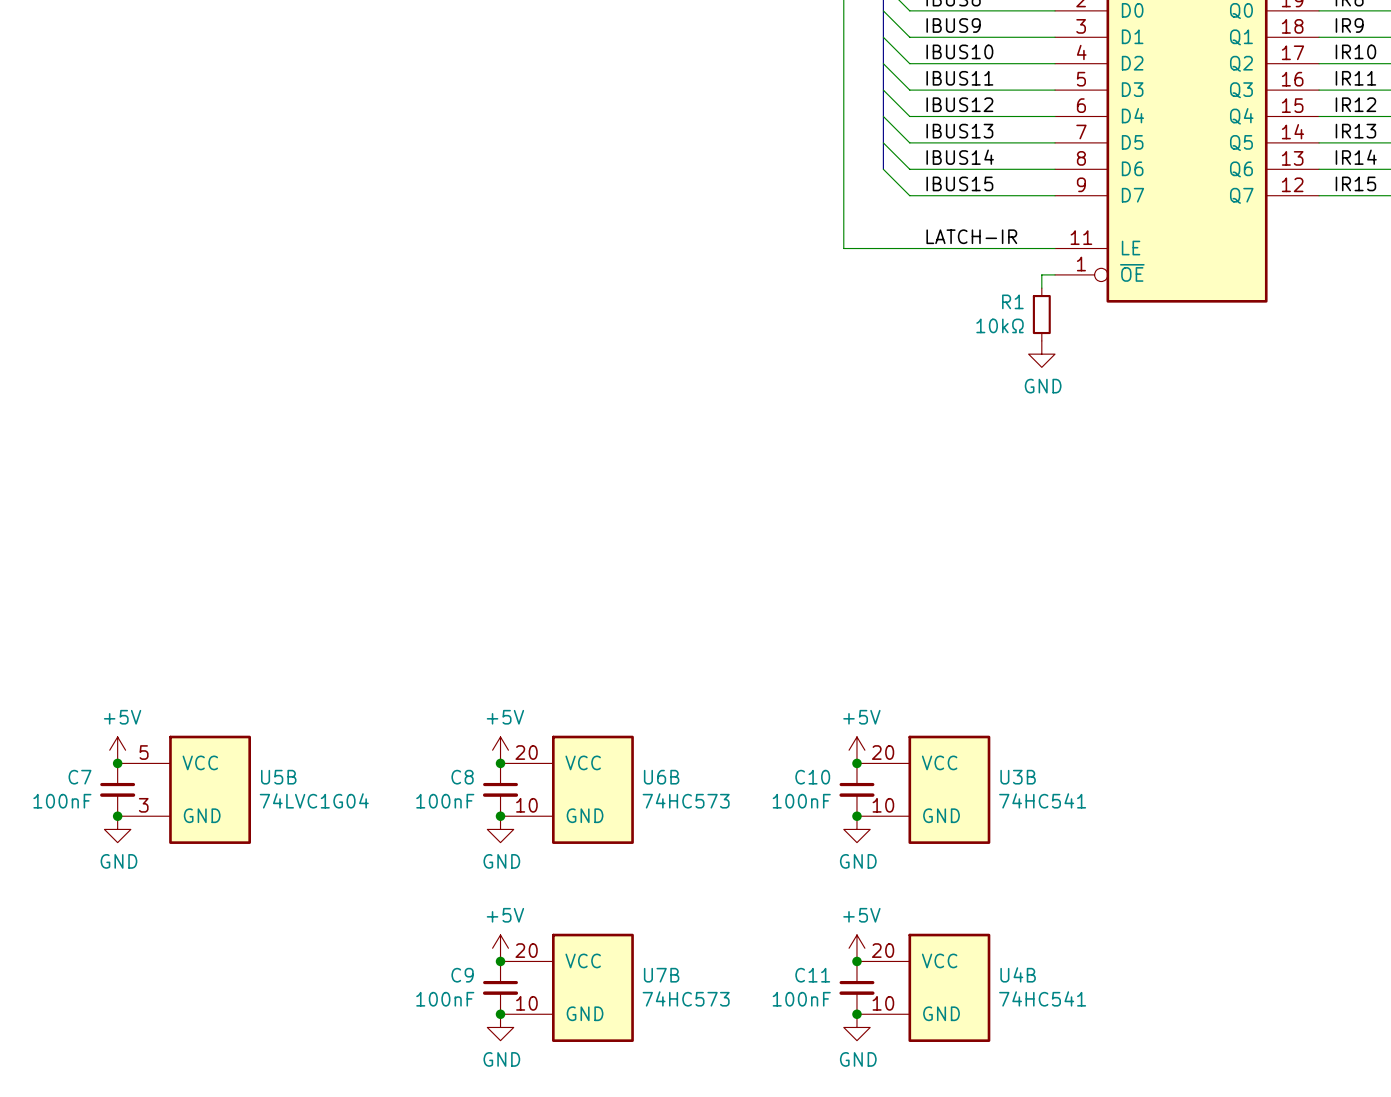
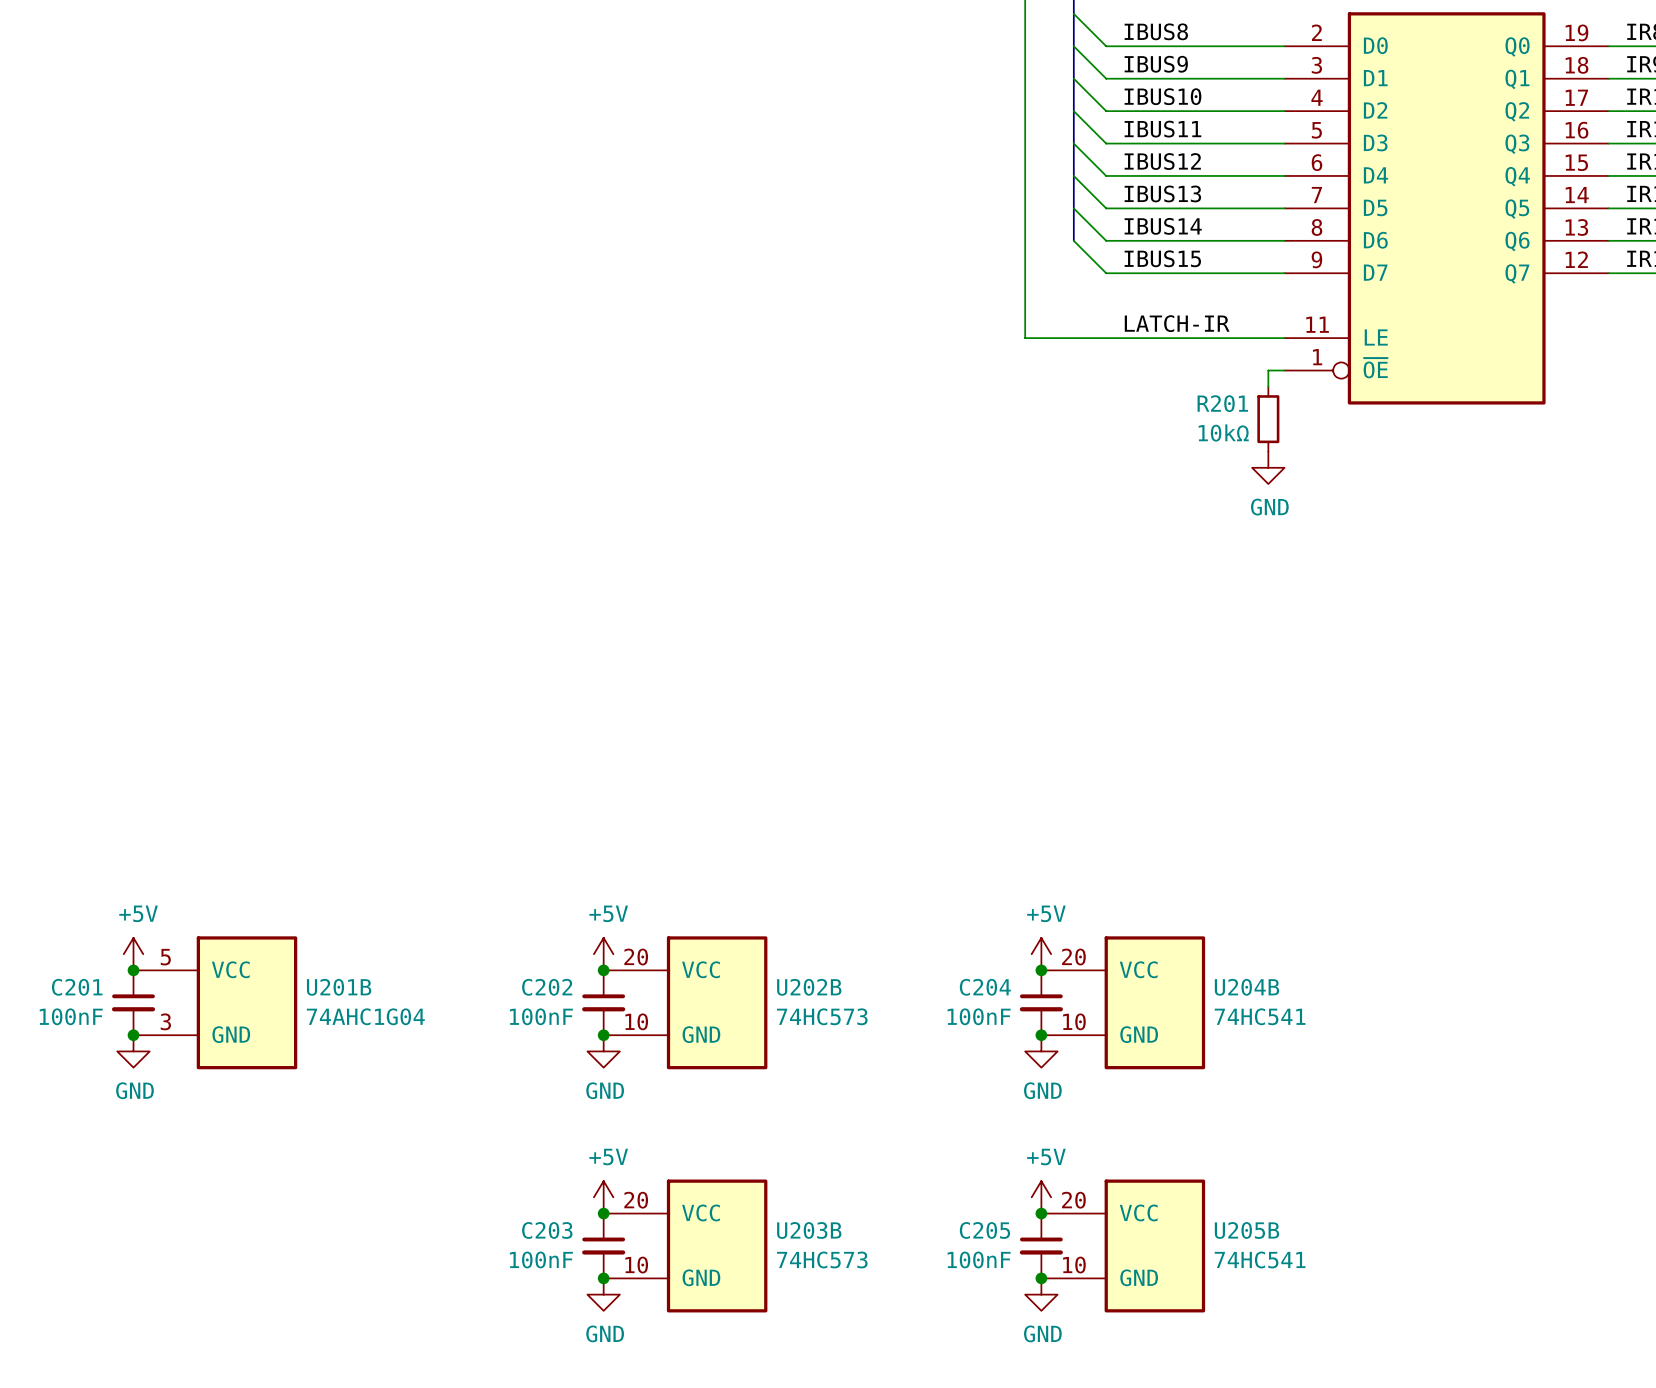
R1 name: R1 (1012, 301) -> R201 (1222, 403)
C7 name: C7 (80, 777) -> C201 (77, 987)
U5B name: U5B (278, 777) -> U201B (339, 987)
C8 name: C8 (462, 777) -> C202 (547, 987)
U6B name: U6B (661, 777) -> U202B (809, 987)
C10 name: C10 (812, 777) -> C204 (985, 987)
U3B name: U3B (1018, 777) -> U204B (1246, 987)
U5B value: 74LVC1G04 (314, 800) -> 74AHC1G04 (365, 1016)
U4B name: U4B (1018, 974) -> U205B (1246, 1230)
C9 name: C9 (462, 975) -> C203 (547, 1230)
U7B name: U7B (661, 975) -> U203B (809, 1230)
C11 name: C11 (812, 975) -> C205 (984, 1230)

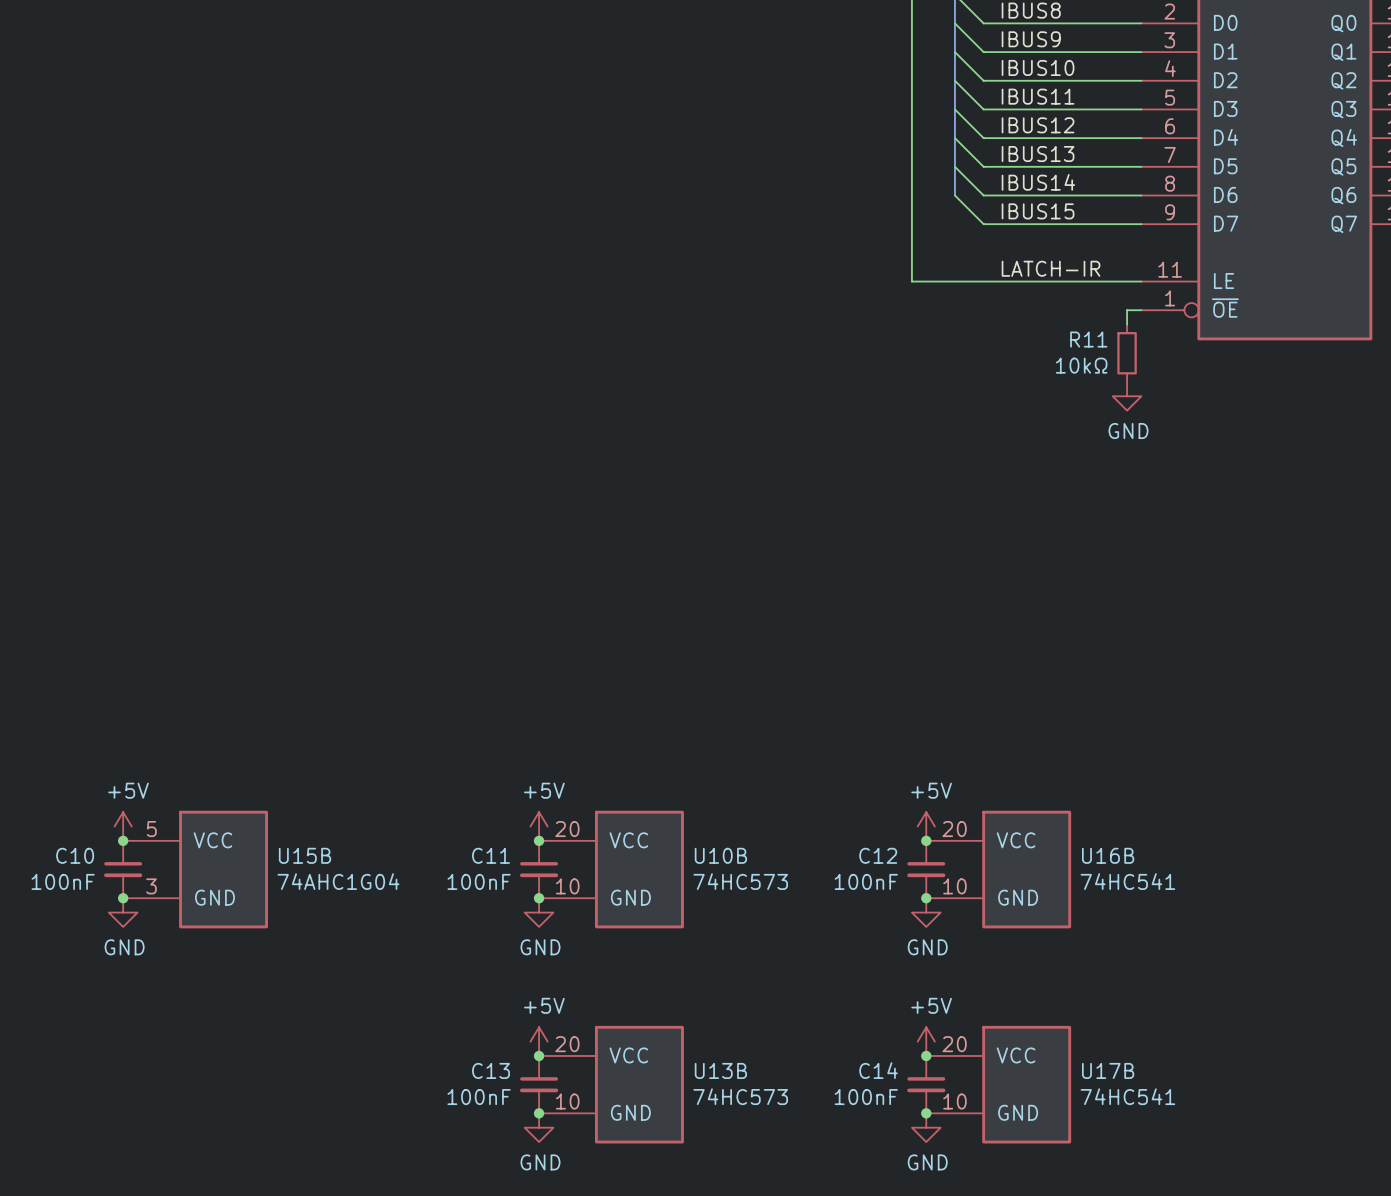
R201 name: R201 (1222, 403) -> R11 (1088, 339)
C201 name: C201 (77, 987) -> C10 (75, 855)
U201B name: U201B (339, 987) -> U15B (304, 855)
C202 name: C202 (547, 987) -> C11 (491, 855)
U202B name: U202B (809, 987) -> U10B (720, 855)
C204 name: C204 (985, 987) -> C12 (878, 855)
U204B name: U204B (1246, 987) -> U16B (1108, 855)
C203 name: C203 (547, 1230) -> C13 (491, 1070)
U203B name: U203B (809, 1230) -> U13B (720, 1070)
C205 name: C205 (984, 1230) -> C14 (878, 1070)
U205B name: U205B (1246, 1230) -> U17B (1108, 1070)

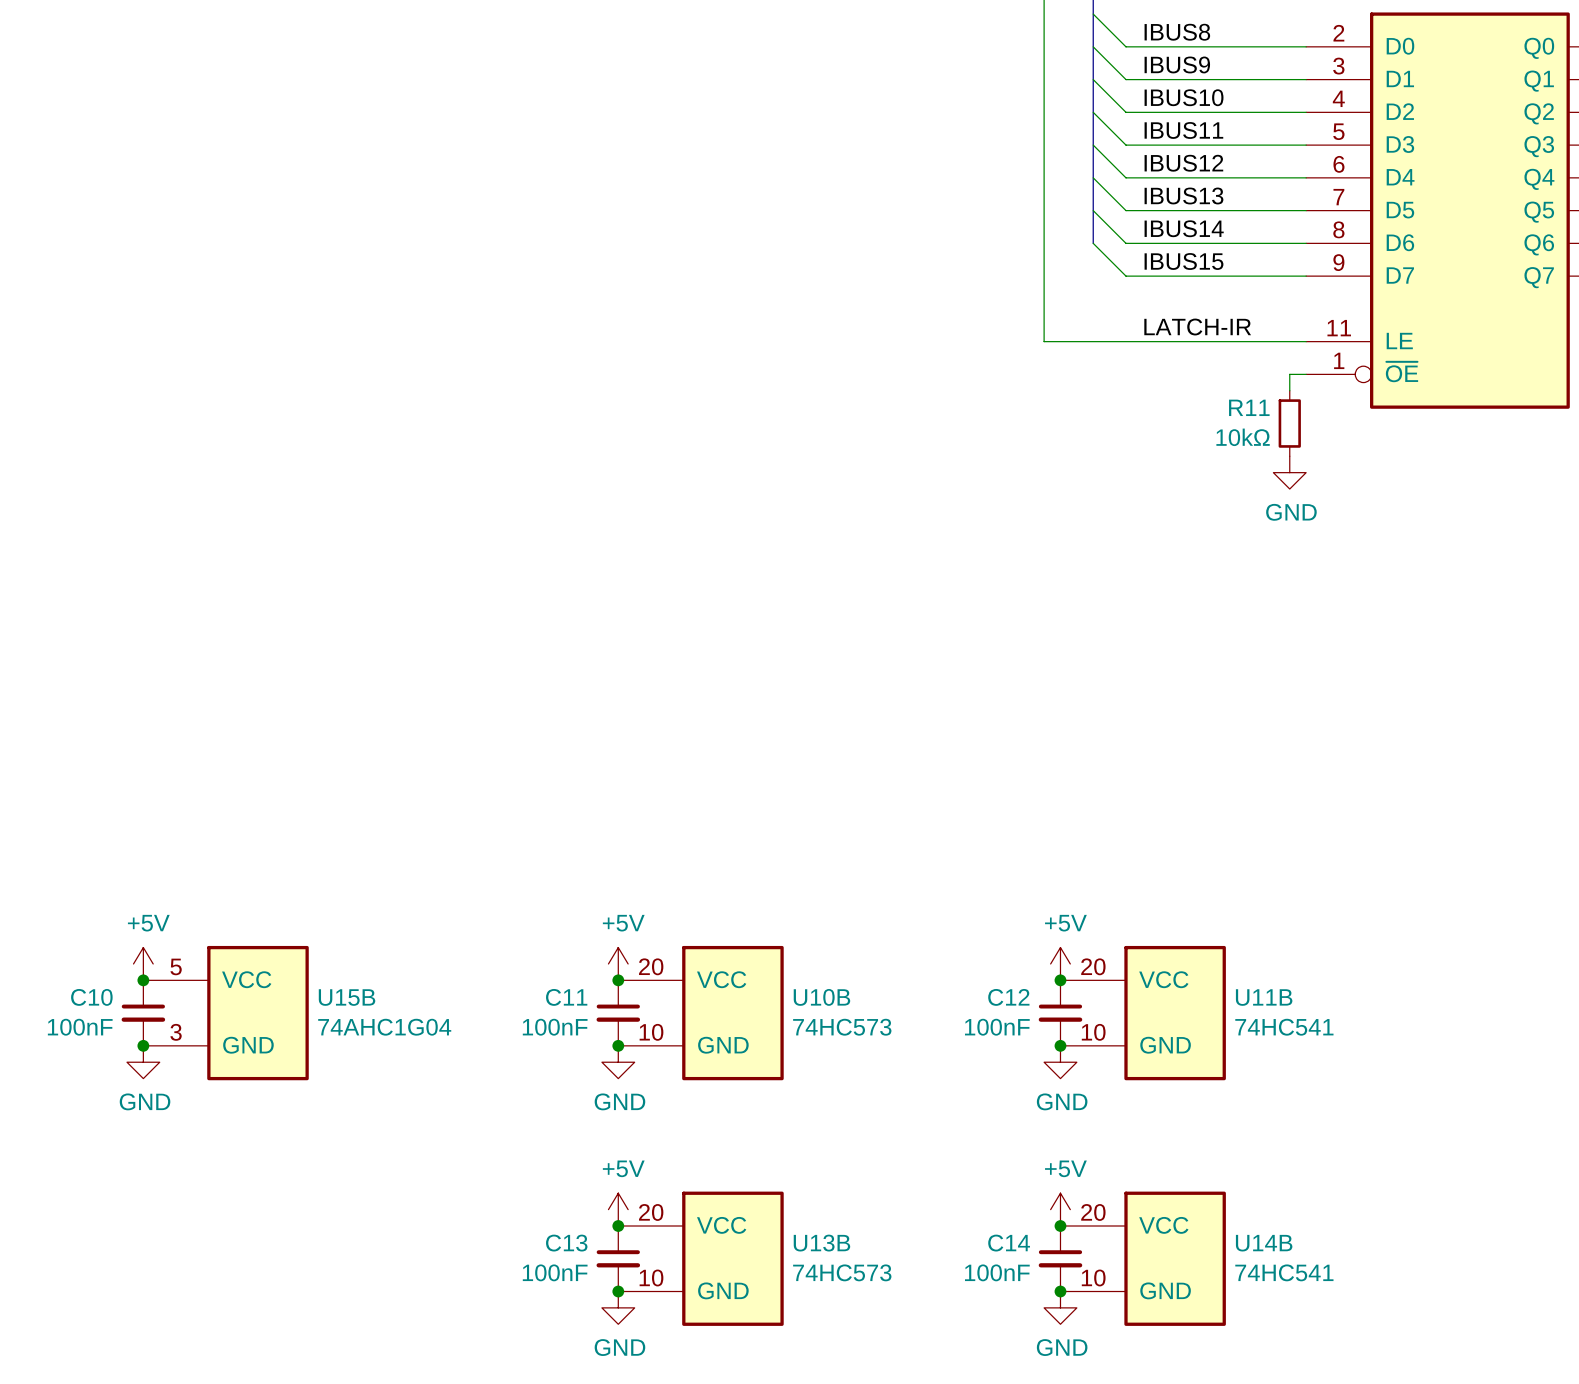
U16B name: U16B (1108, 855) -> U11B (1264, 997)
U17B name: U17B (1108, 1070) -> U14B (1264, 1243)

